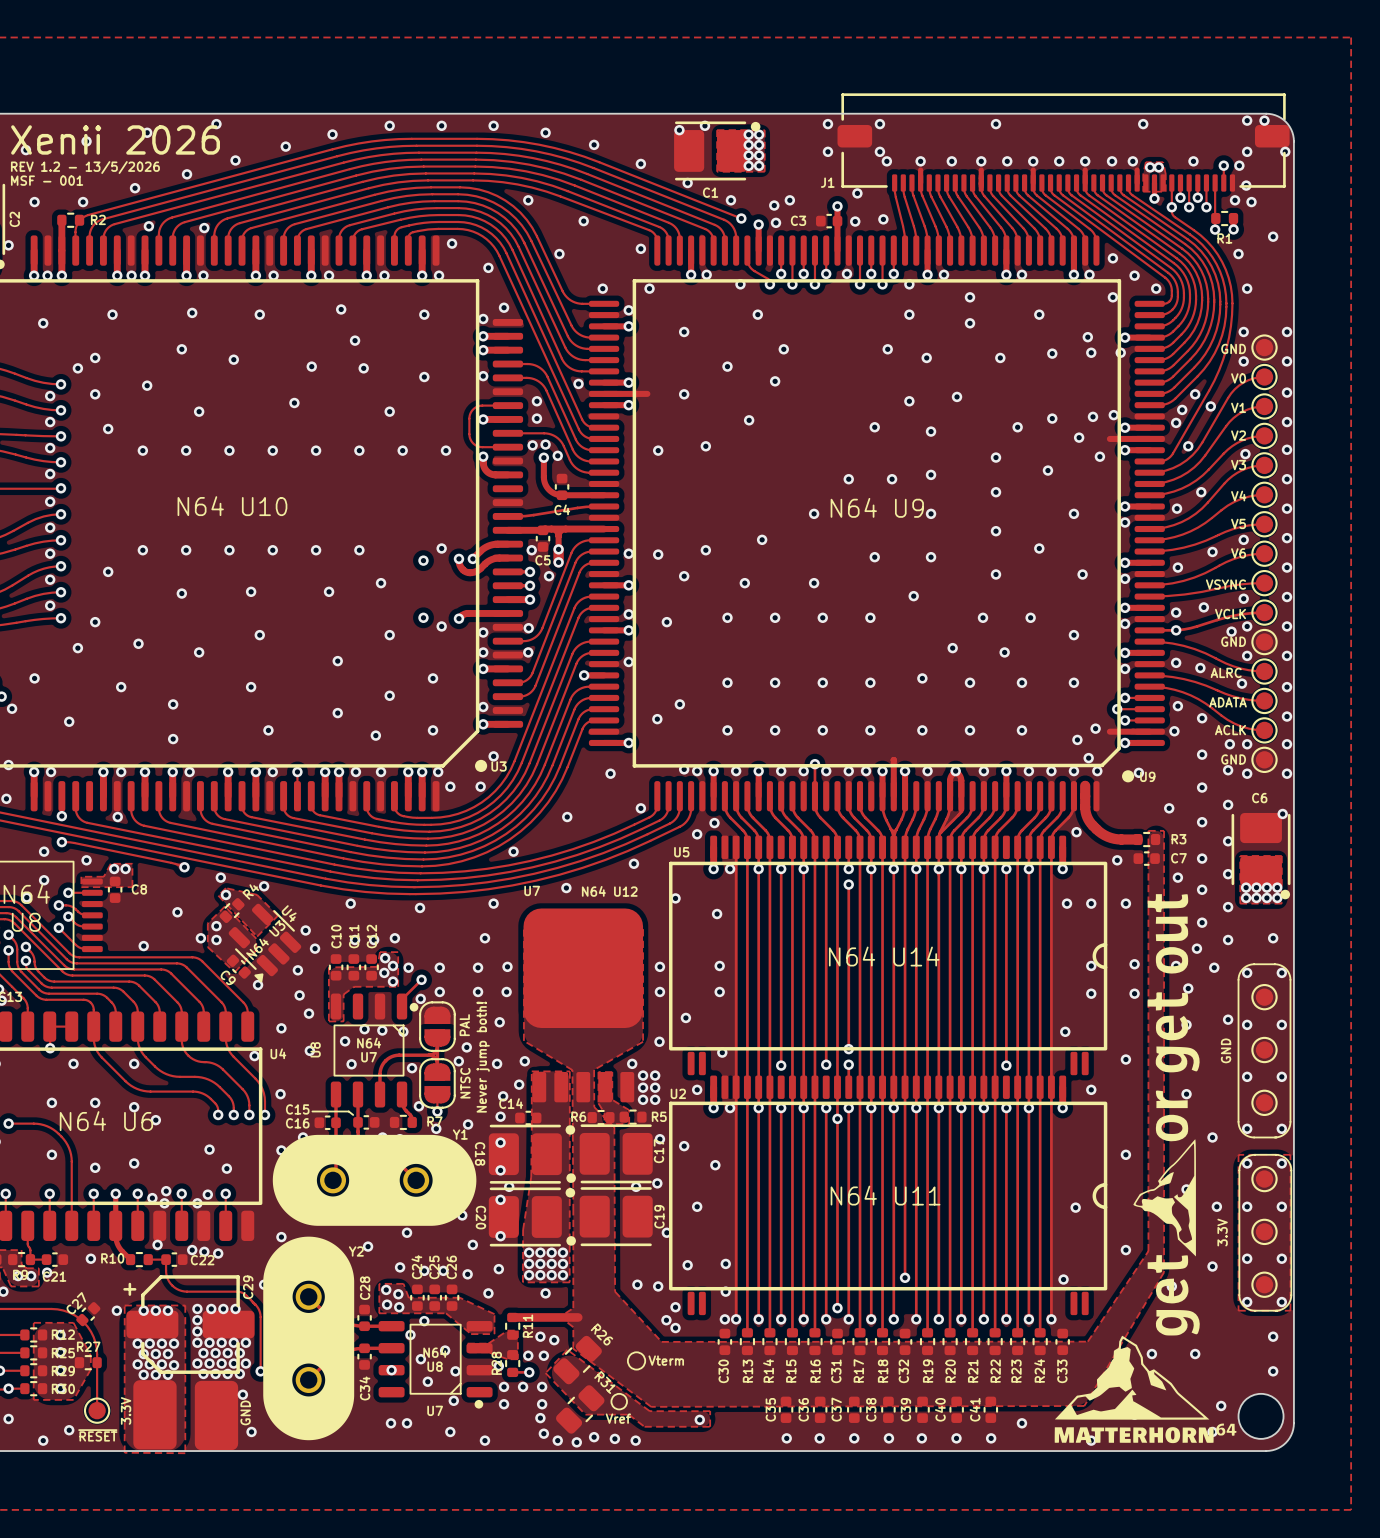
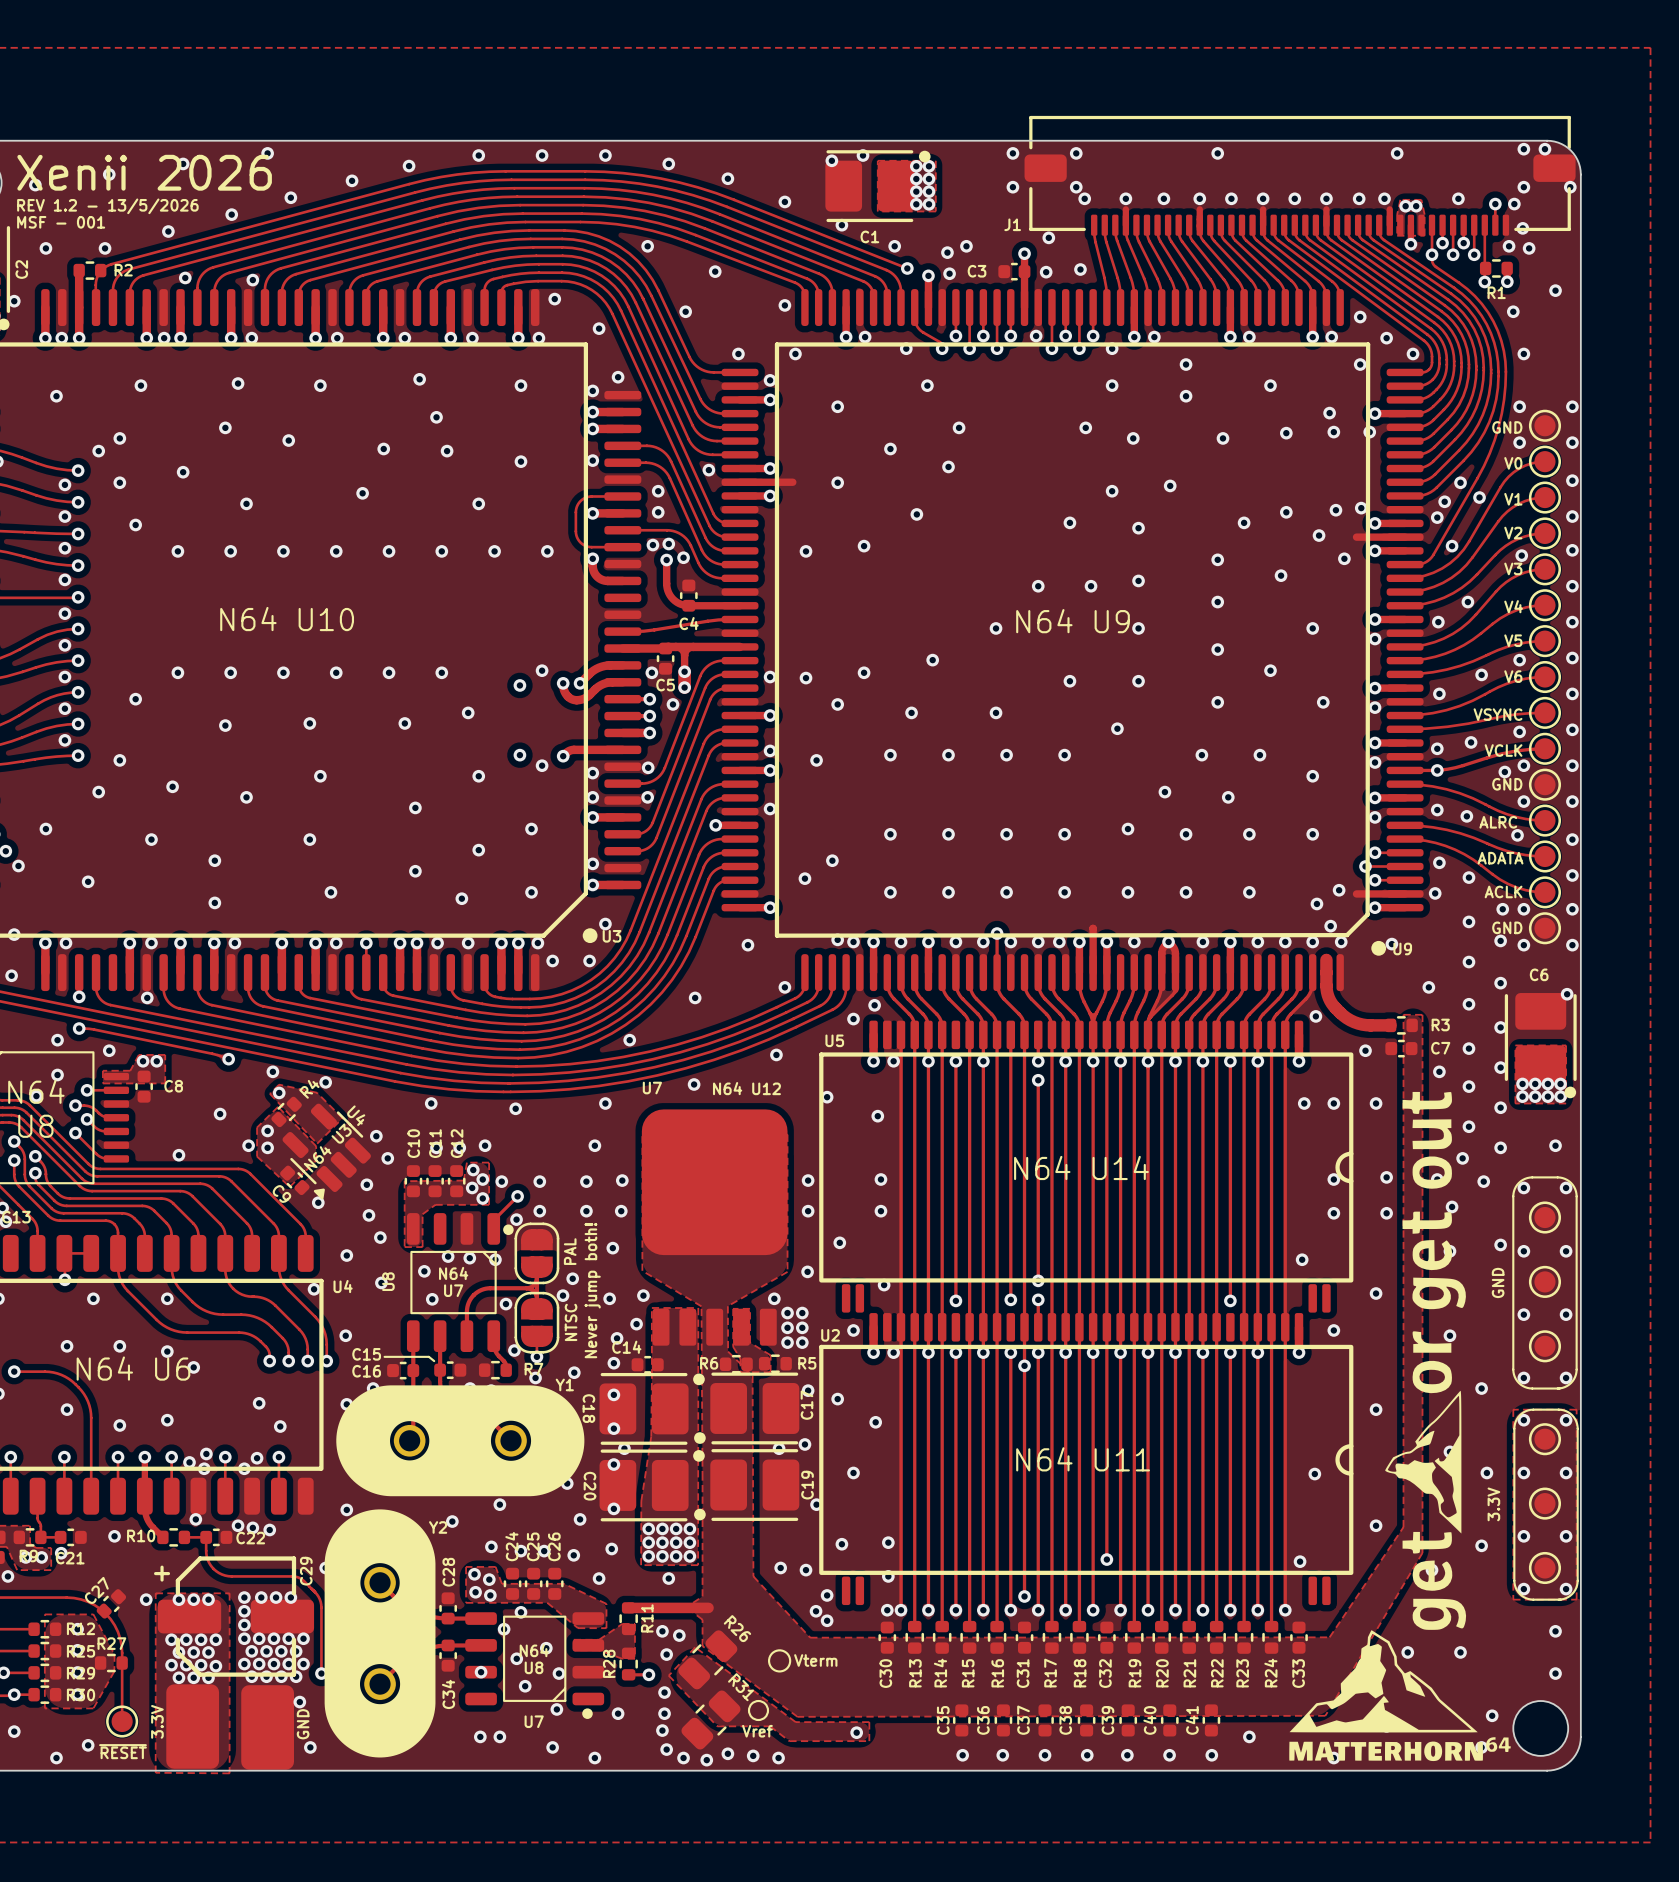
via: (528, 1355) -> none
via: (498, 1366) -> none
via: (504, 1386) -> none
via: (523, 1386) -> none

